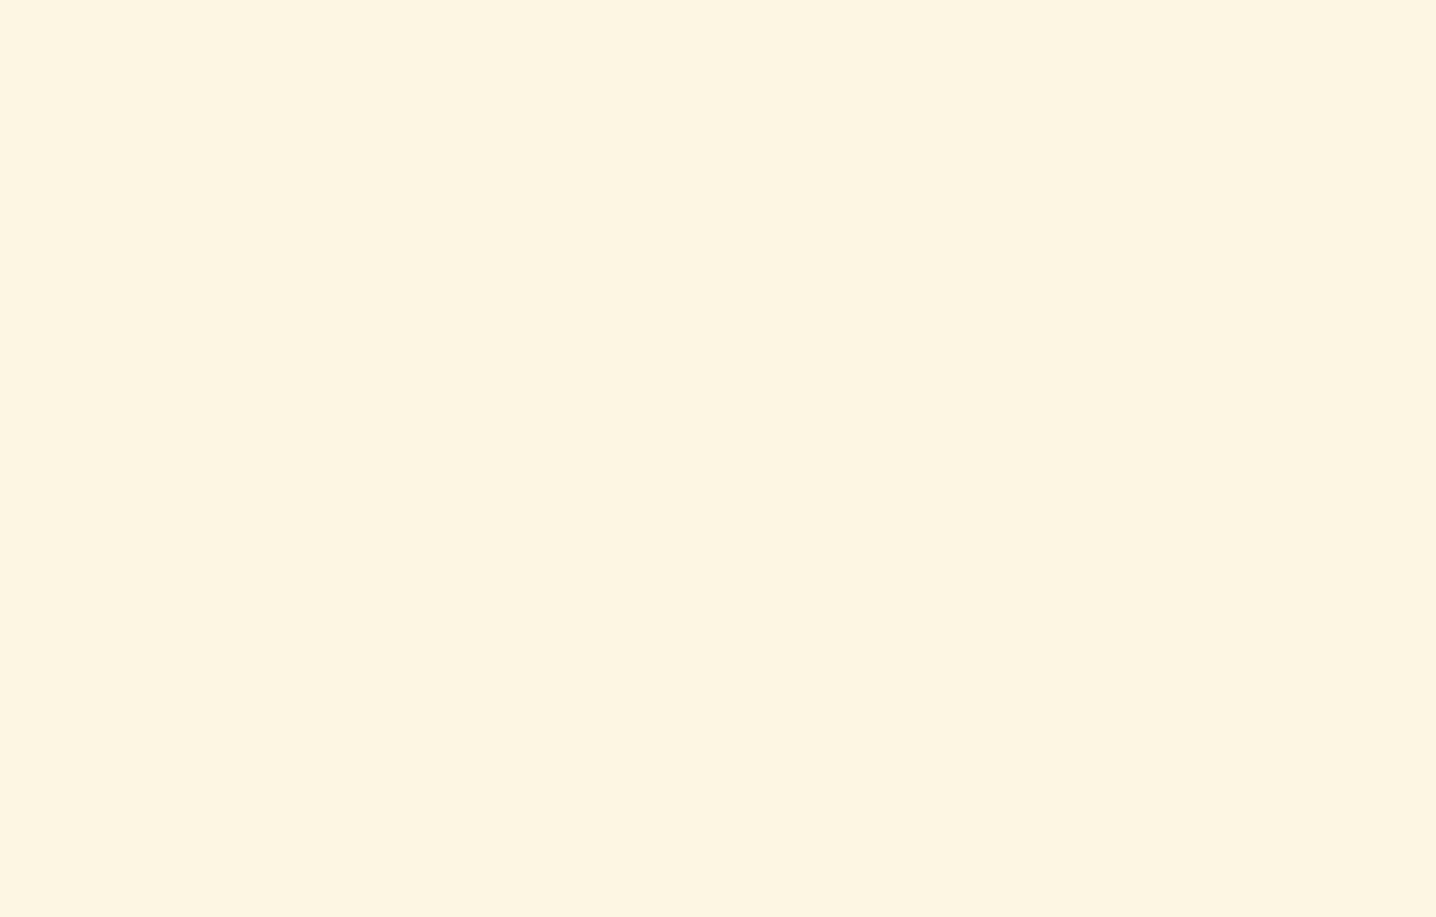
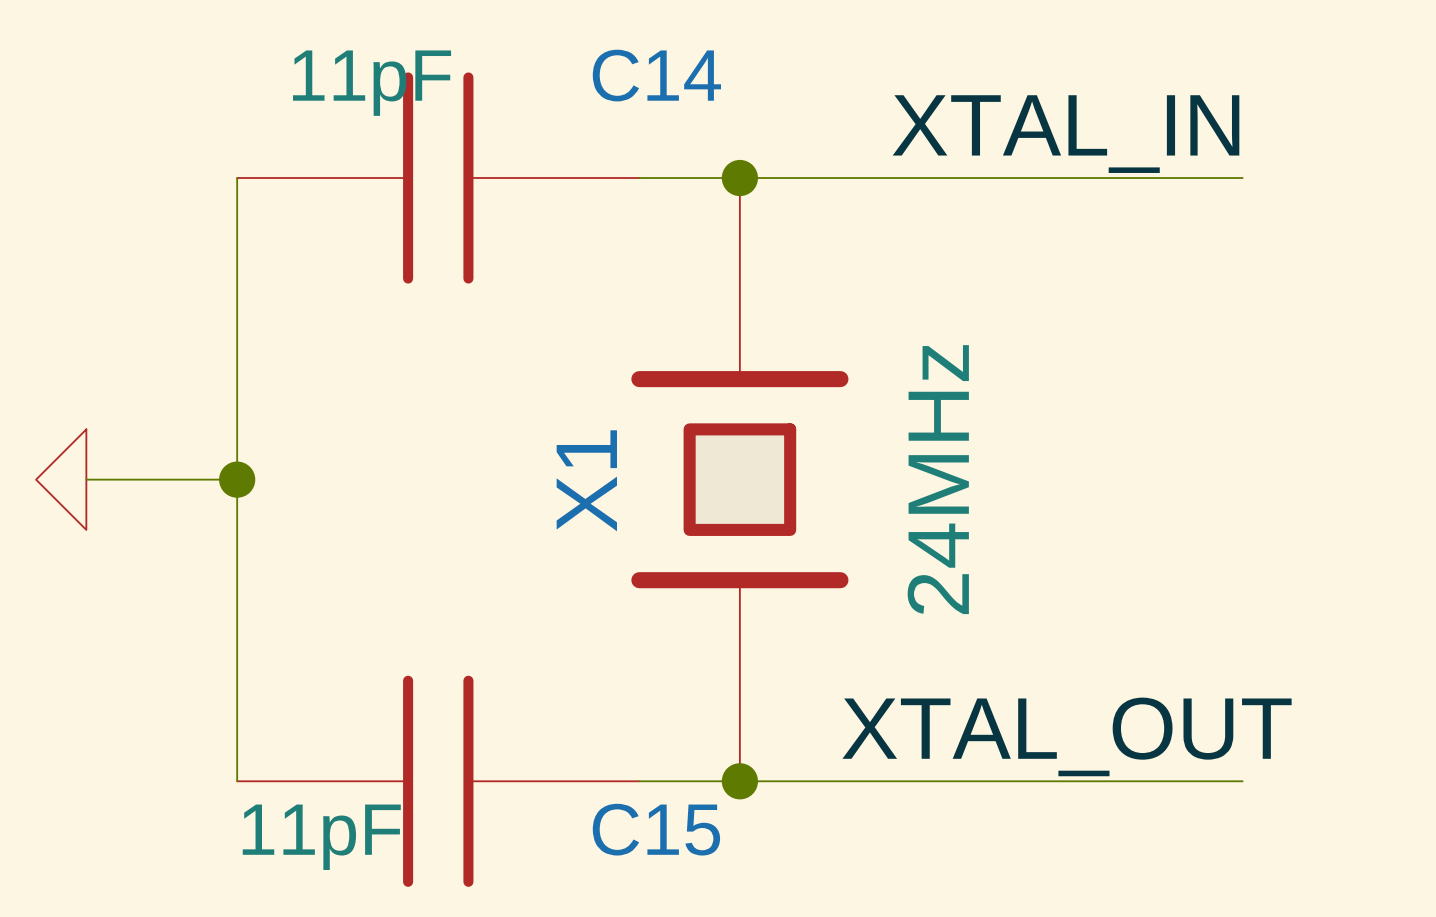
label: none -> XTAL_IN (1066, 134)
wire: none -> (237, 178) (237, 781)
C14: none -> 11pF (438, 178)
wire: none -> (639, 178) (1242, 178)
junction: none -> (739, 178)
power symbol: none -> (61, 479)
wire: none -> (86, 479) (237, 479)
junction: none -> (237, 479)
X1: none -> 24MHz (739, 479)
label: none -> XTAL_OUT (1067, 736)
C15: none -> 11pF (438, 781)
wire: none -> (639, 781) (1242, 781)
junction: none -> (739, 781)

